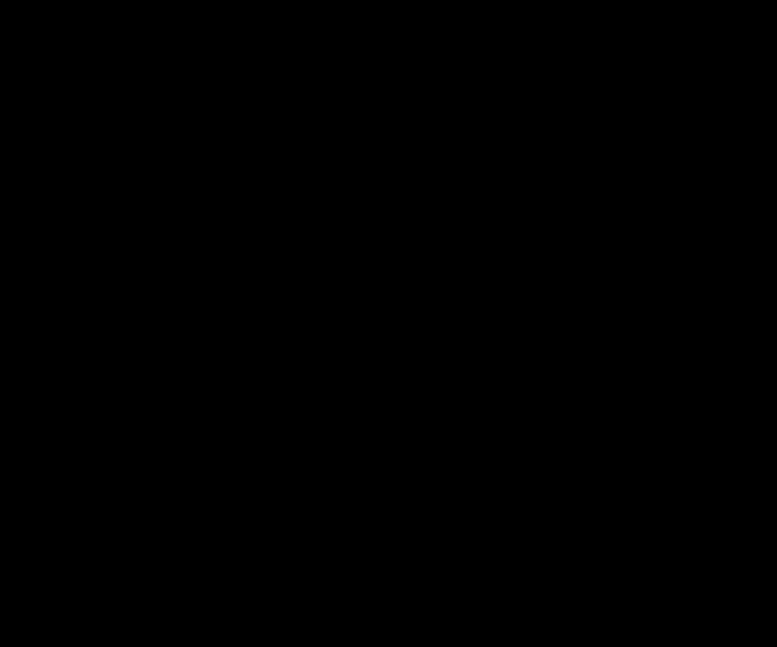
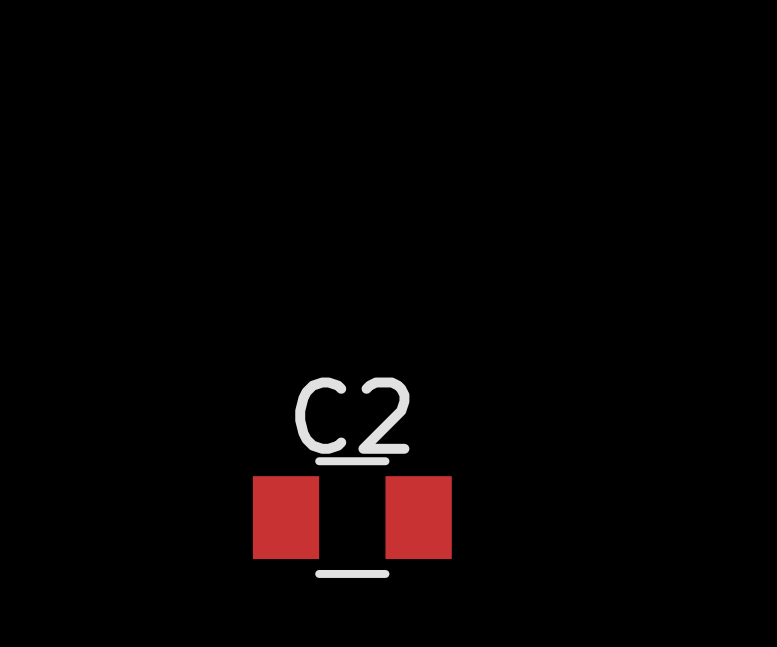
C2: none -> (352, 517)

